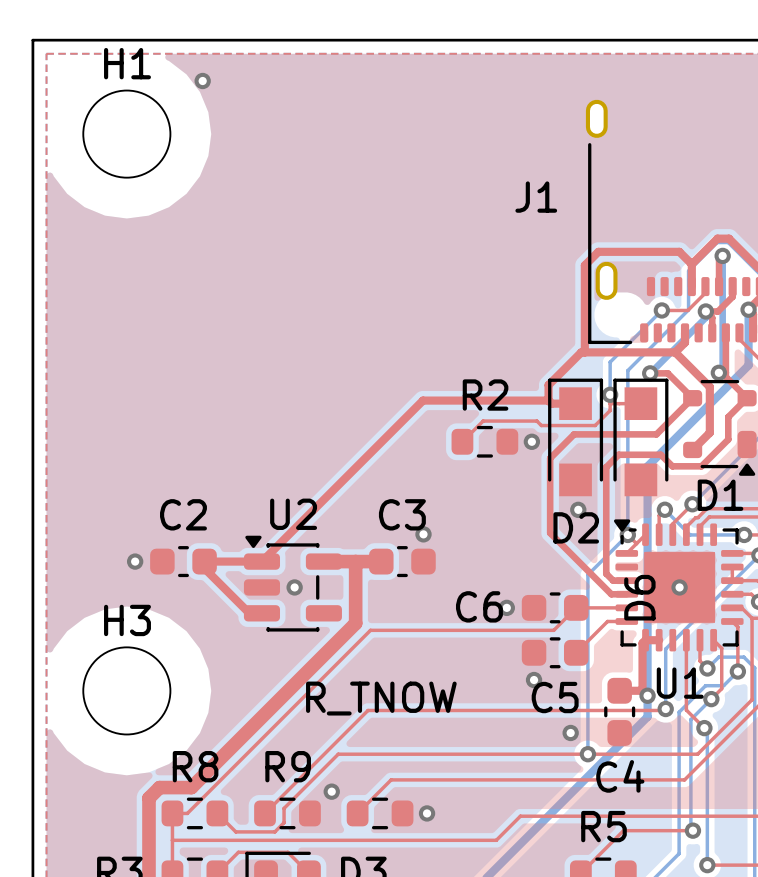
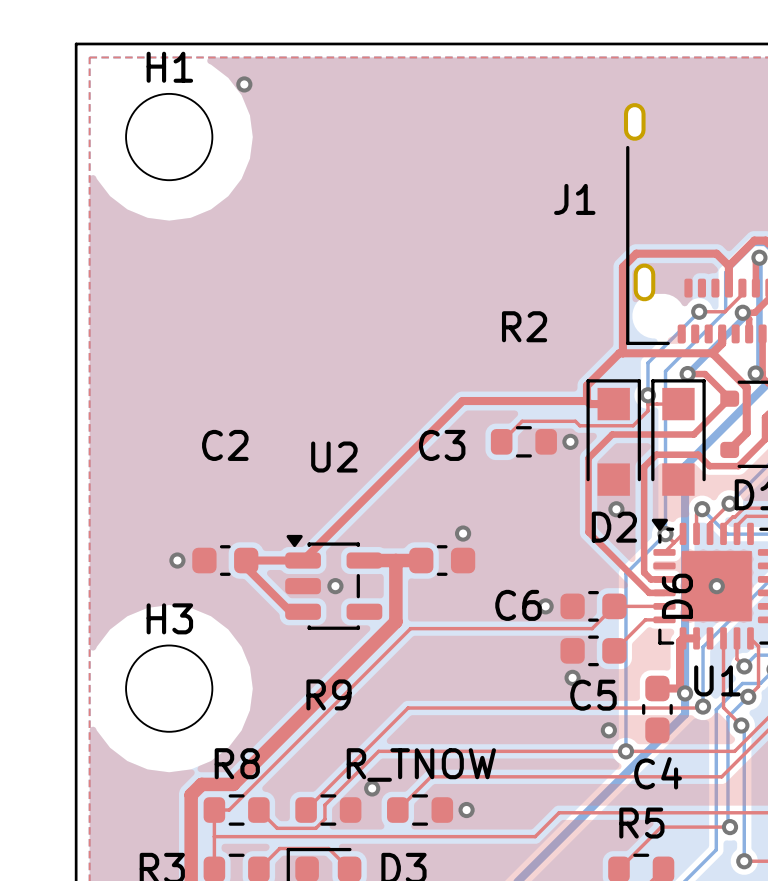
R2 name position: R2 (485, 395) -> R2 (524, 326)
C2 name position: C2 (183, 514) -> C2 (225, 445)
U2 name position: U2 (293, 514) -> U2 (334, 457)
C3 name position: C3 (402, 514) -> C3 (442, 445)
R_TNOW name position: R_TNOW (381, 698) -> R_TNOW (421, 764)
R9 name position: R9 (288, 766) -> R9 (328, 694)

